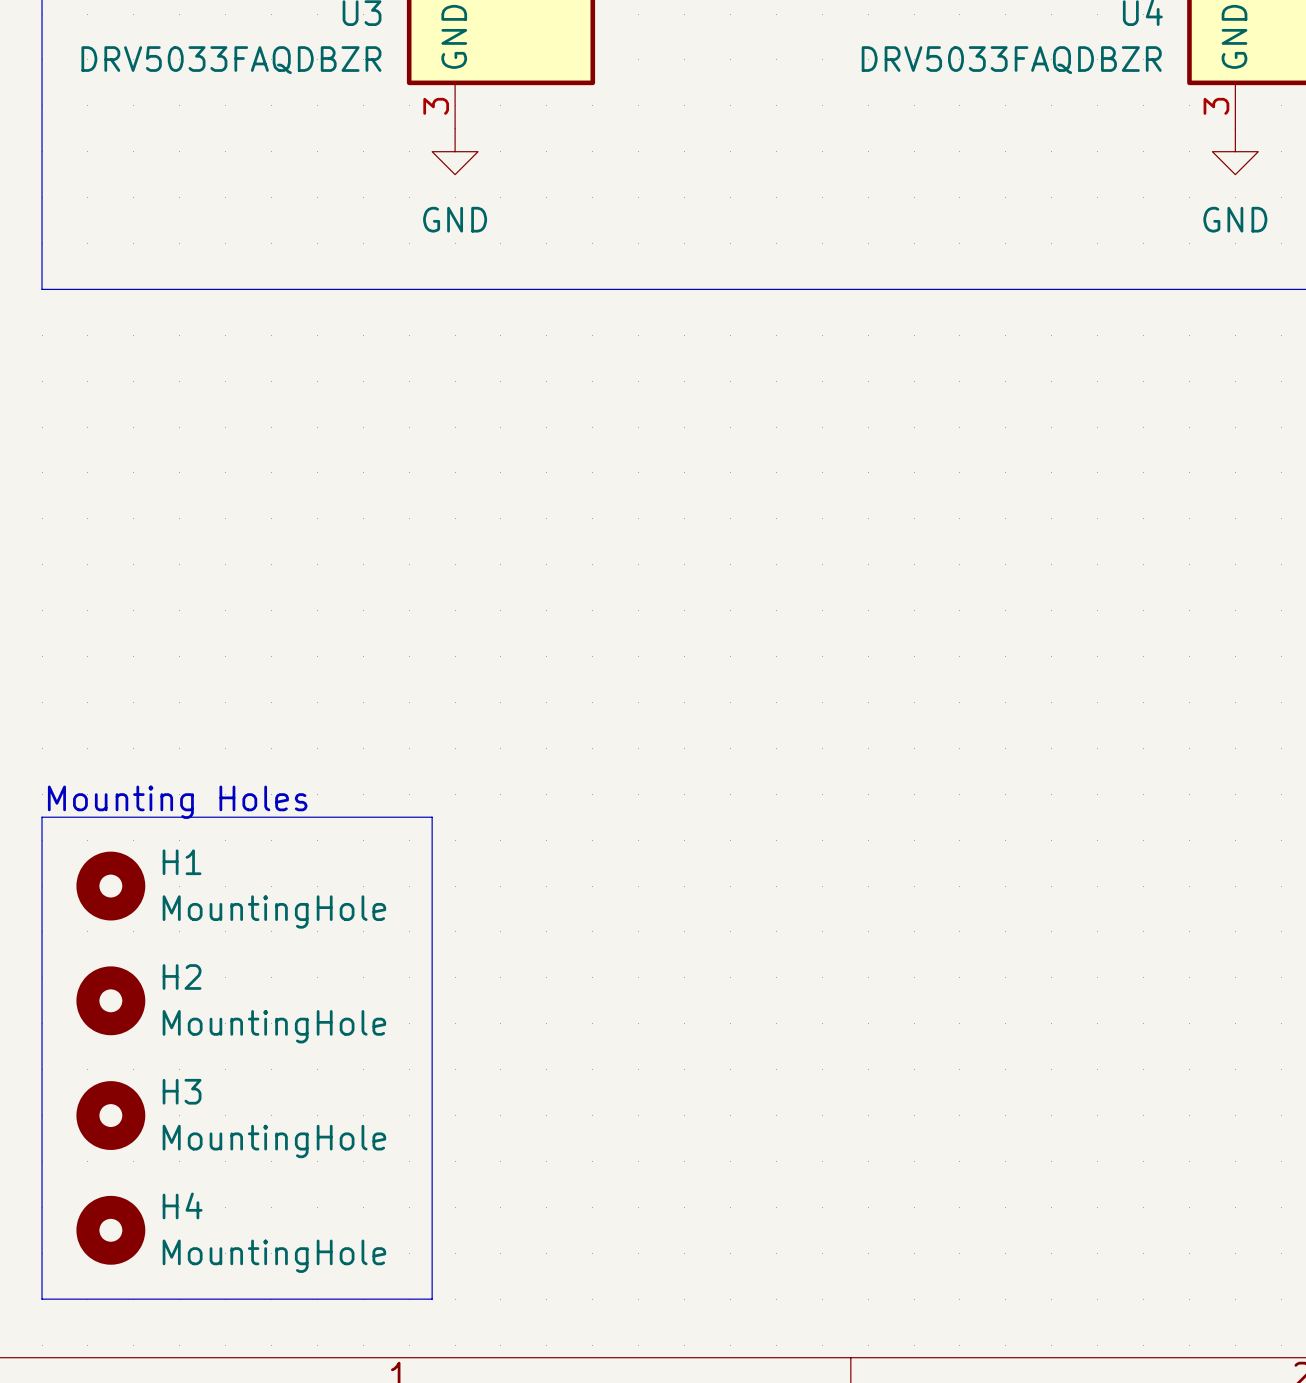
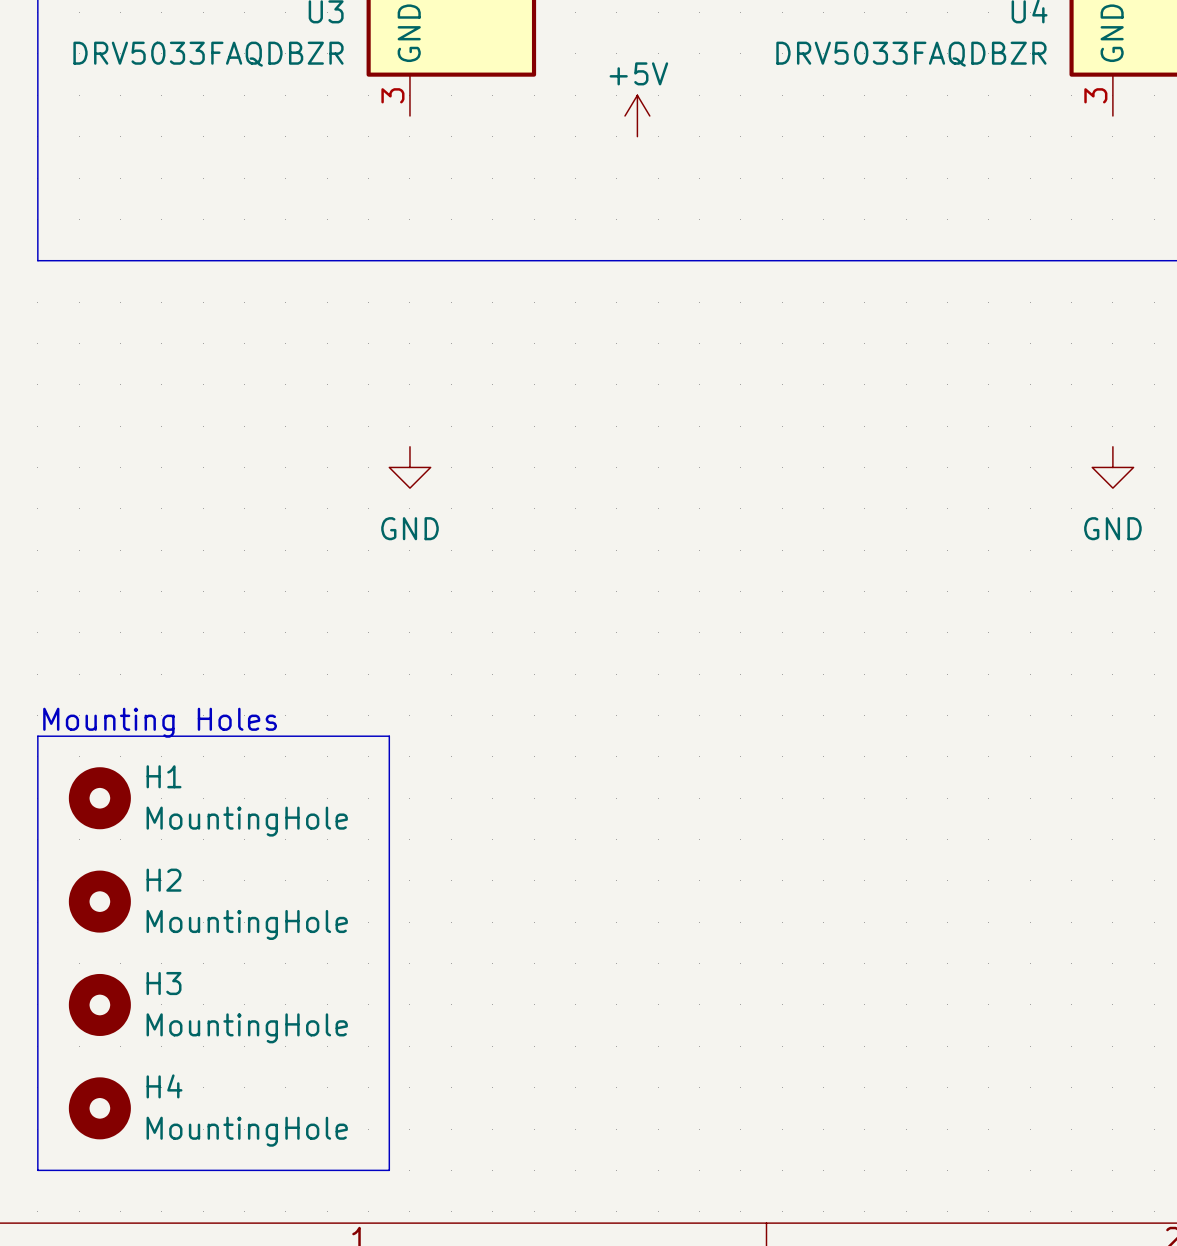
power symbol: none -> +5V (637, 115)
power symbol position: GND (455, 151) -> GND (409, 467)
power symbol position: GND (1235, 151) -> GND (1112, 467)

